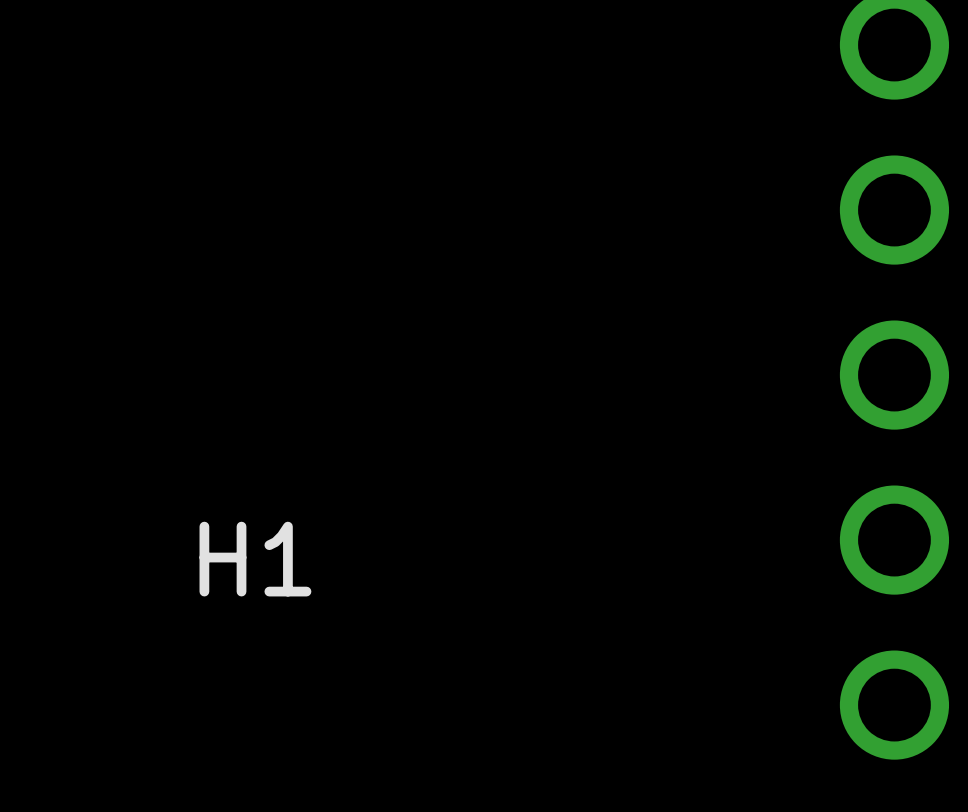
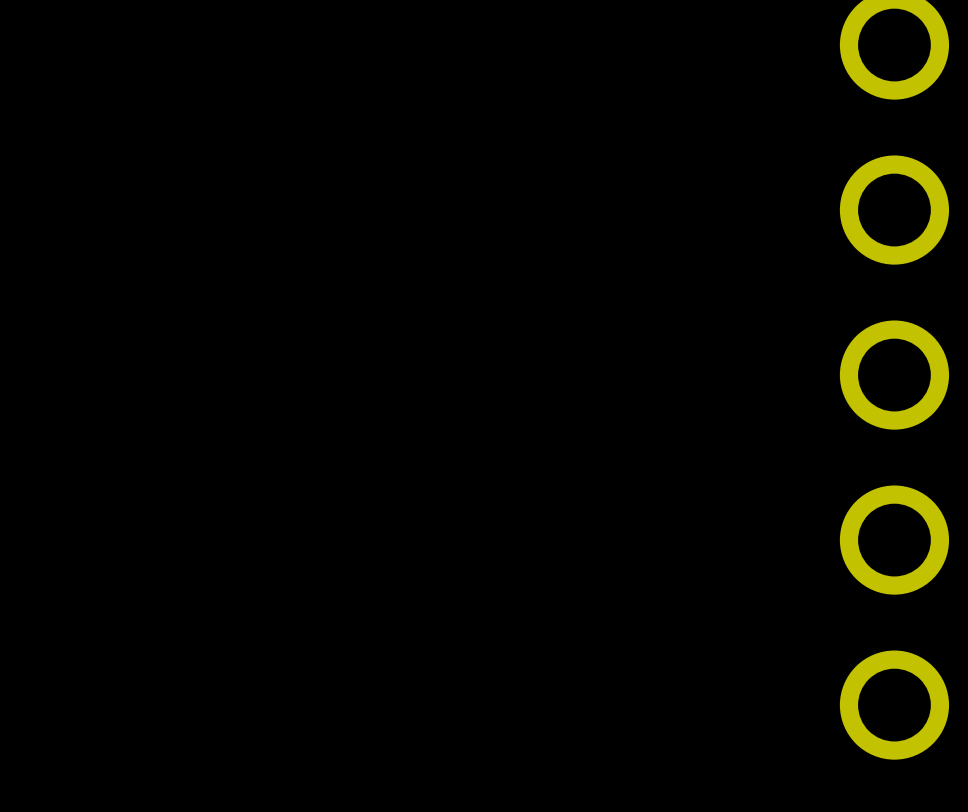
H1 name: H1 (255, 559) -> none

